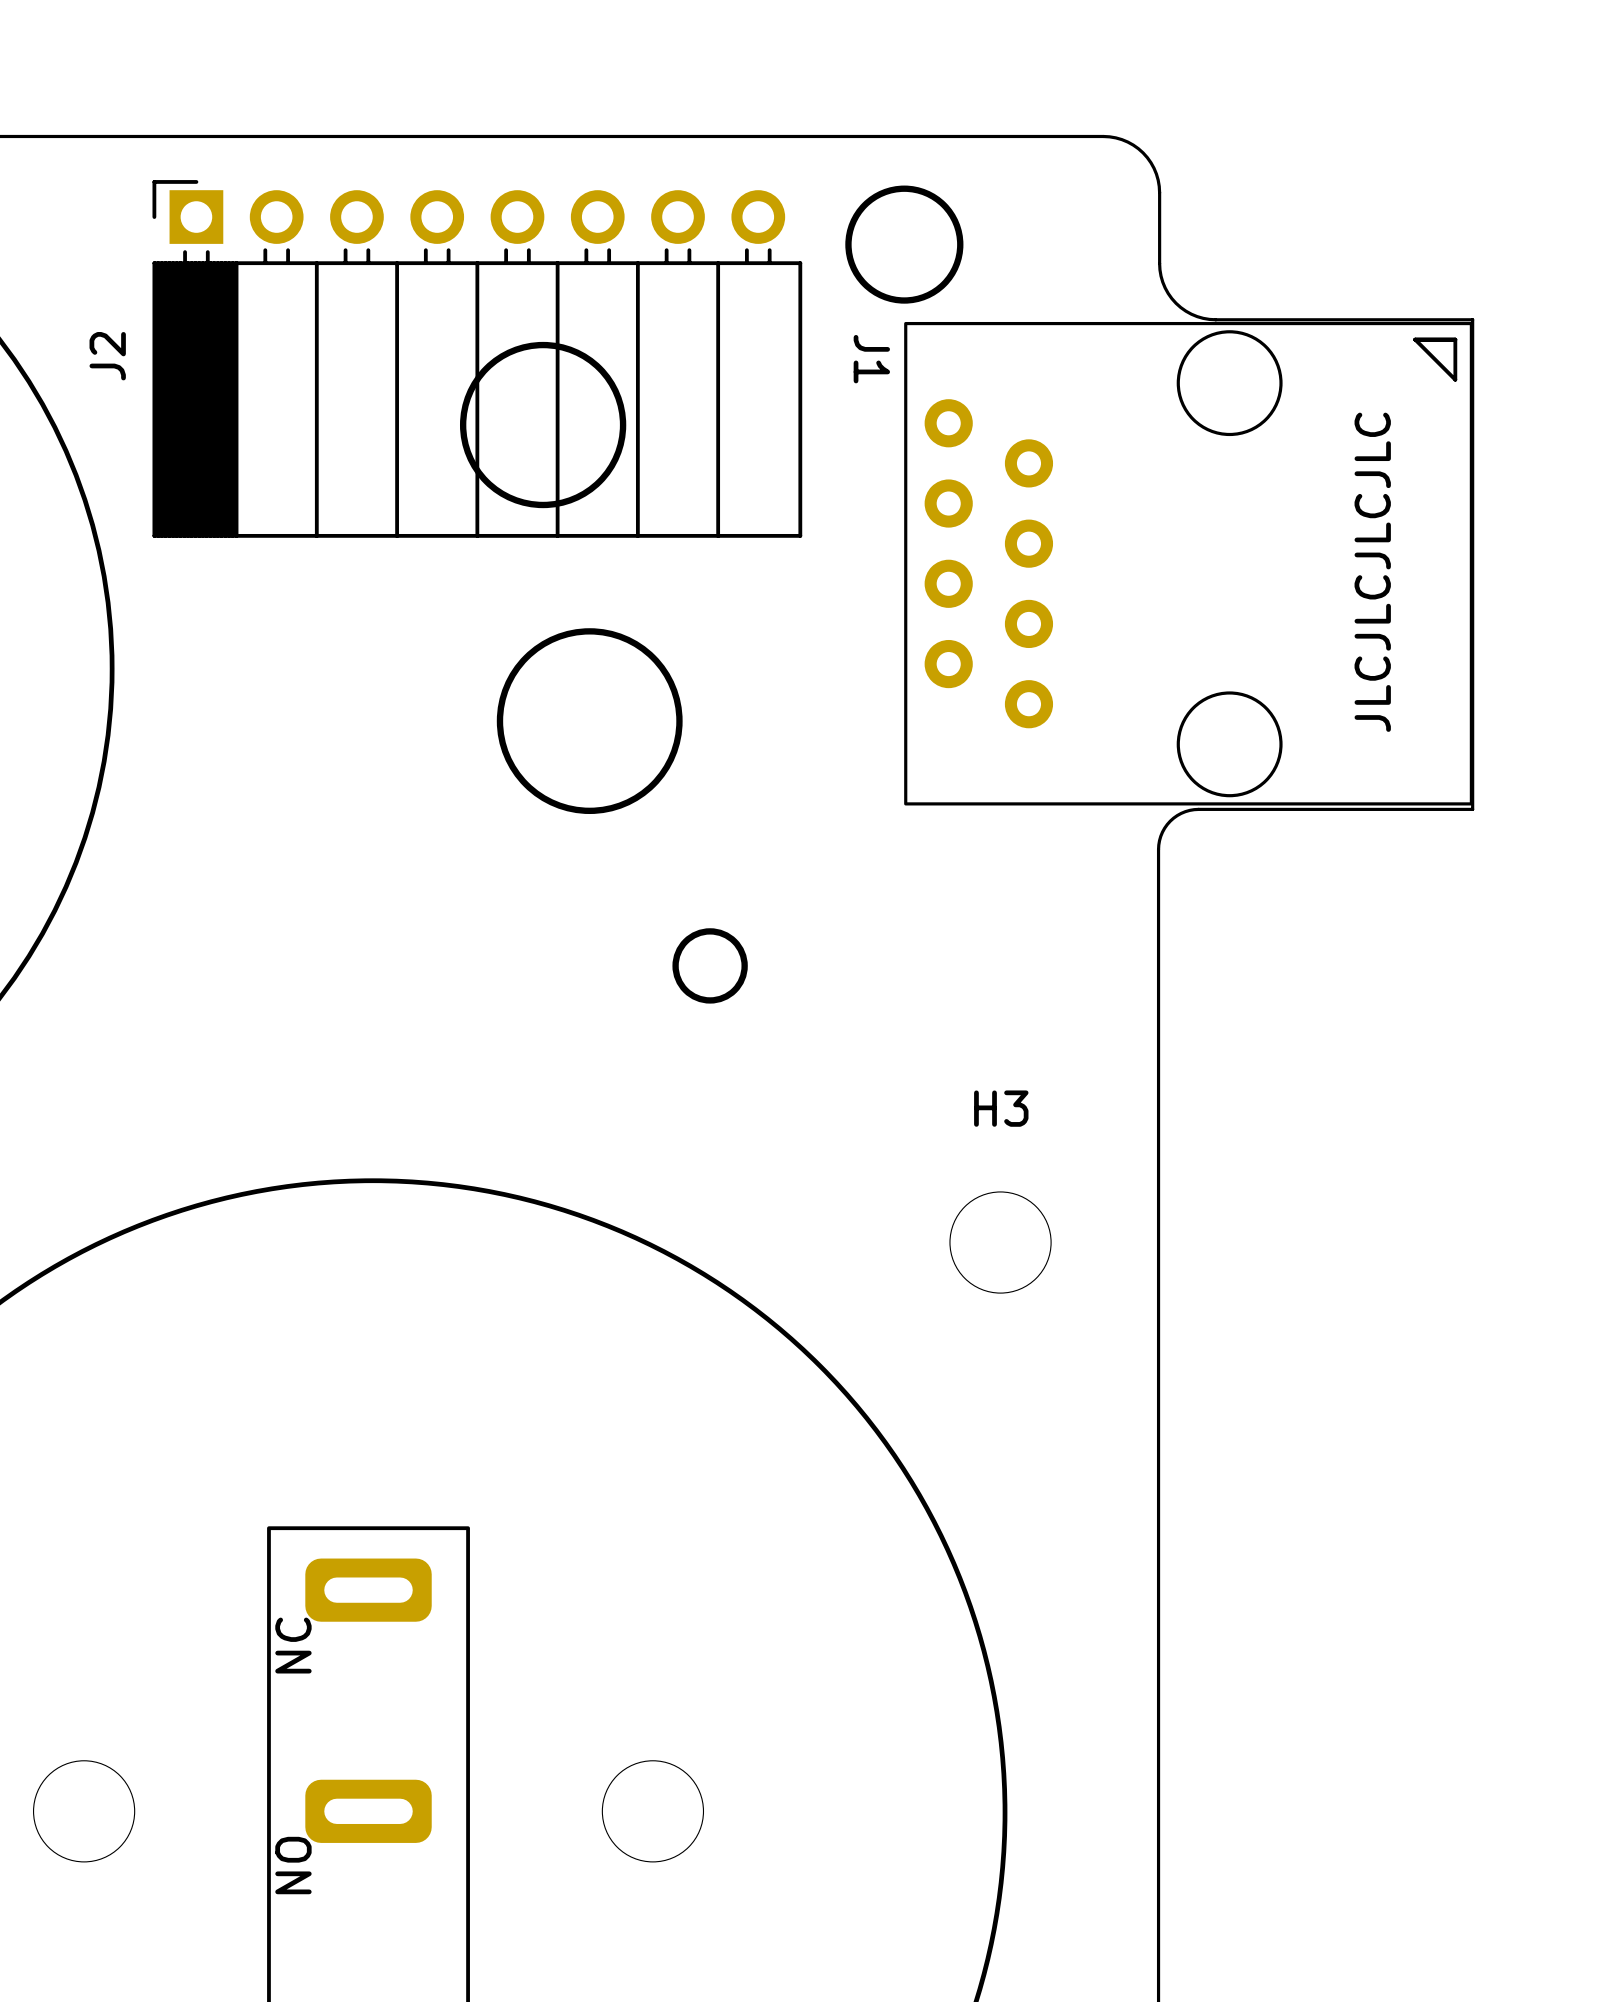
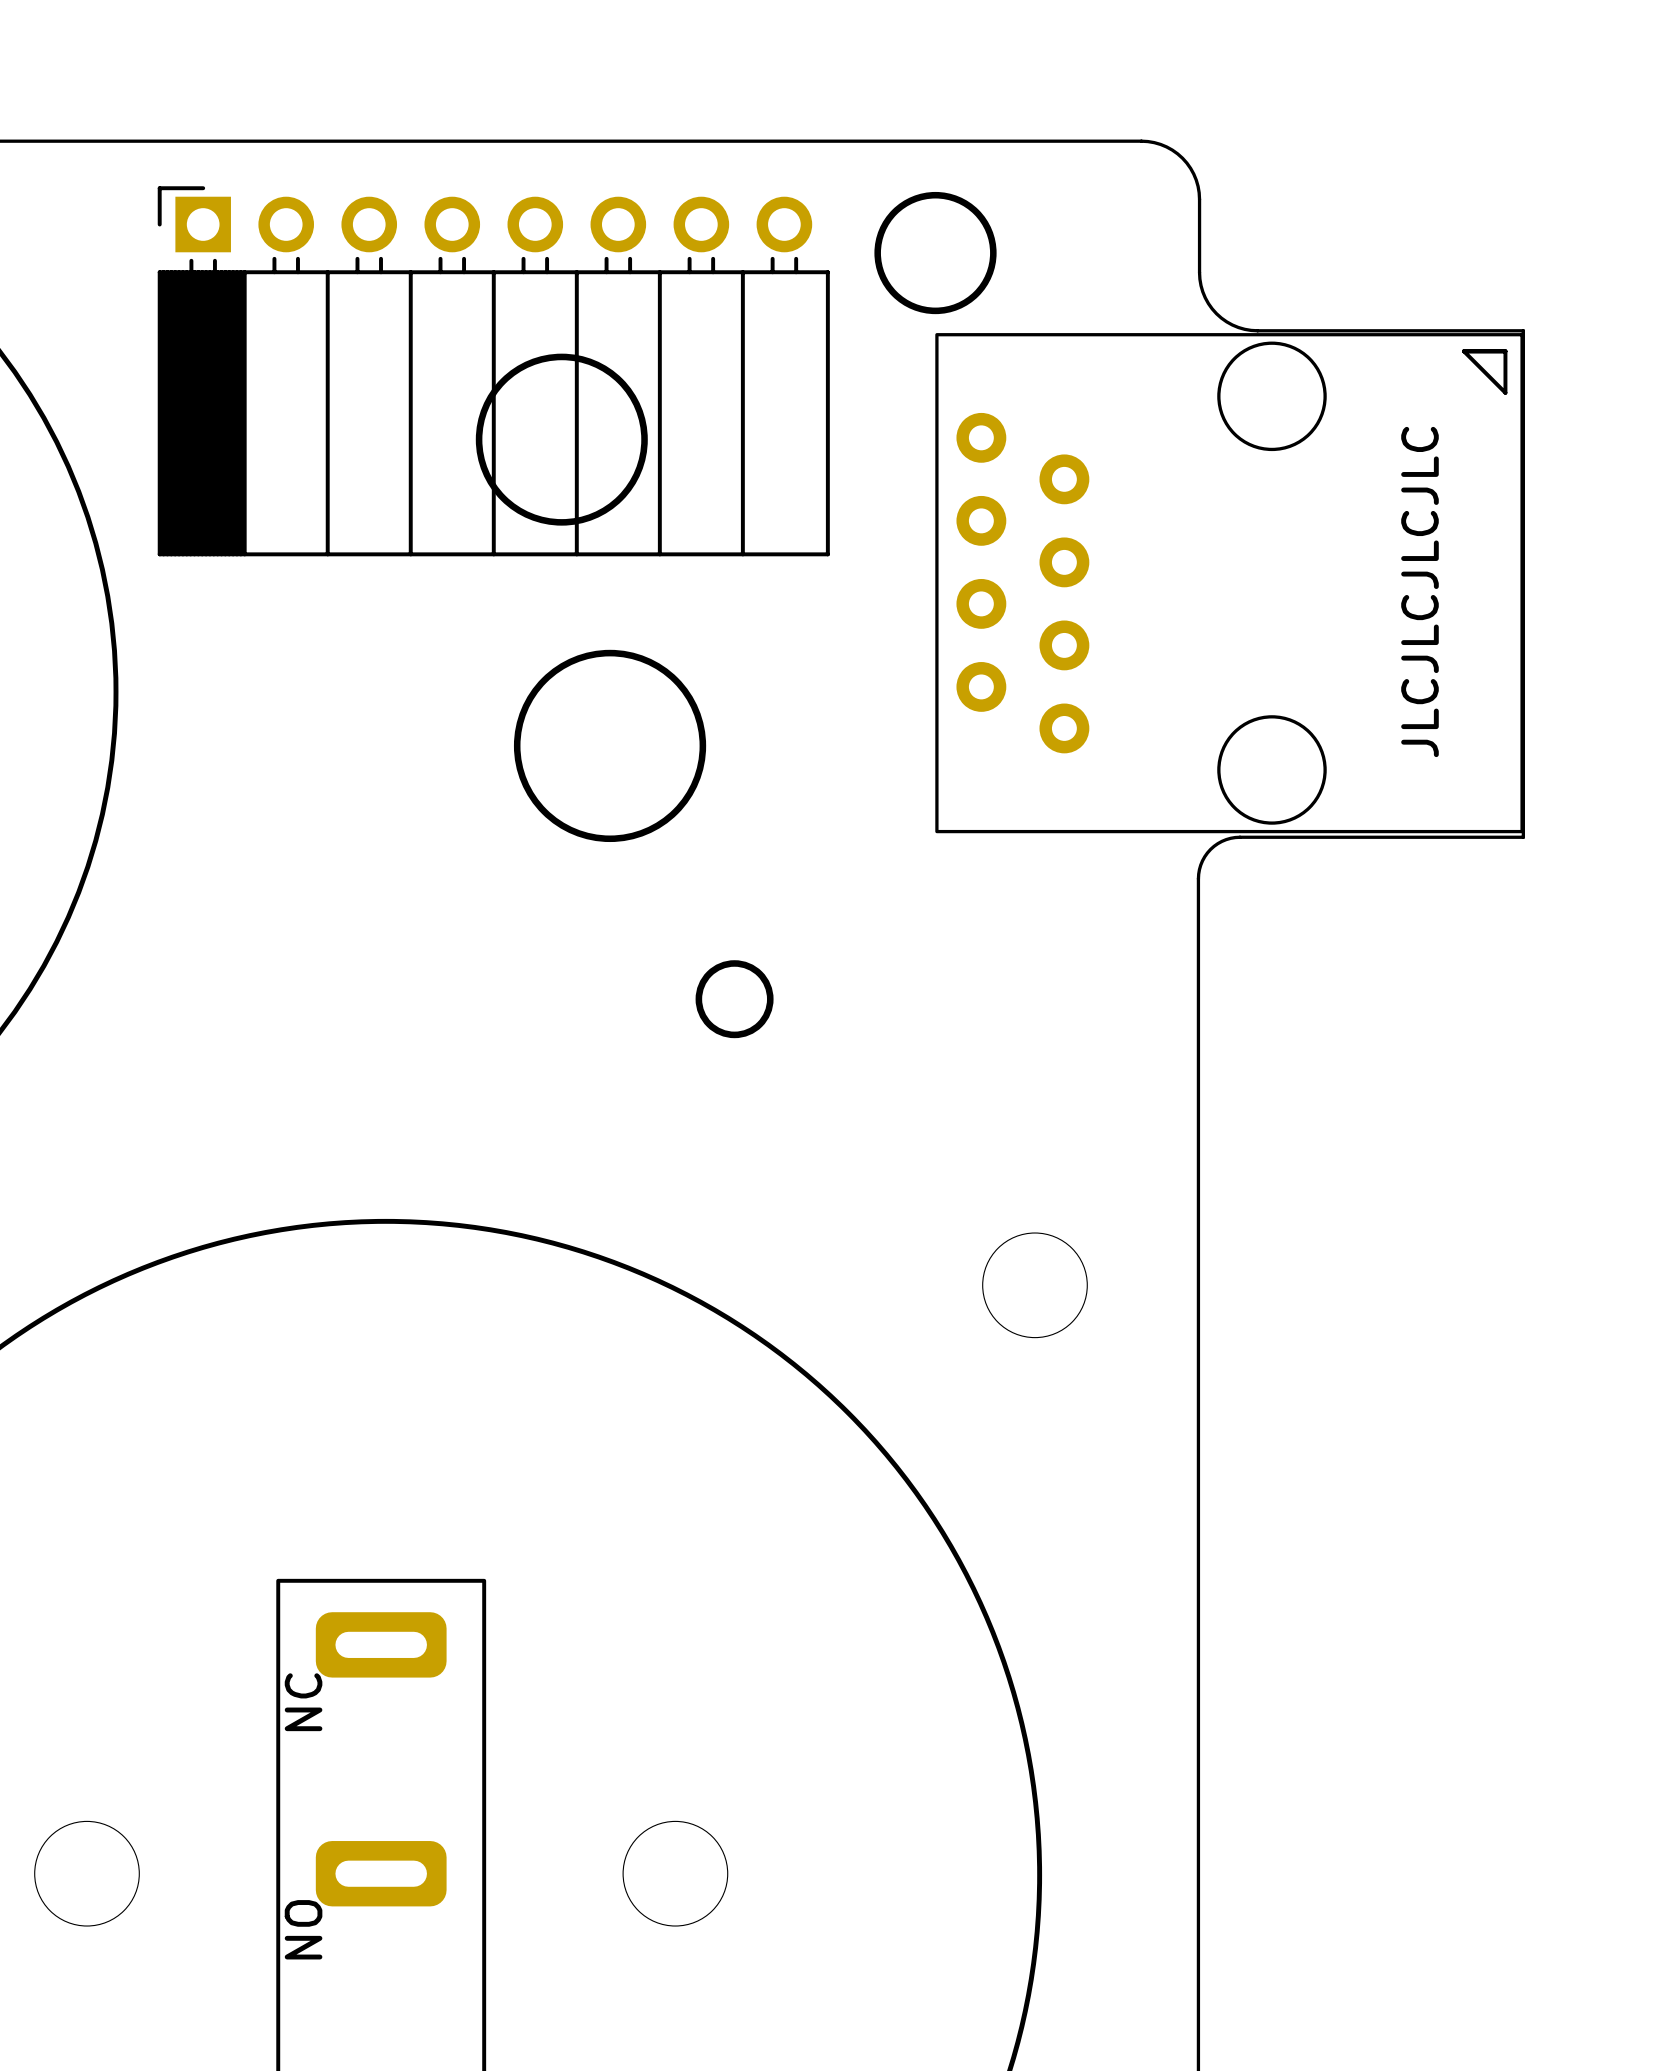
J2 name: J2 (107, 356) -> none
J1 name: J1 (871, 359) -> none
H3 name: H3 (1001, 1108) -> none

